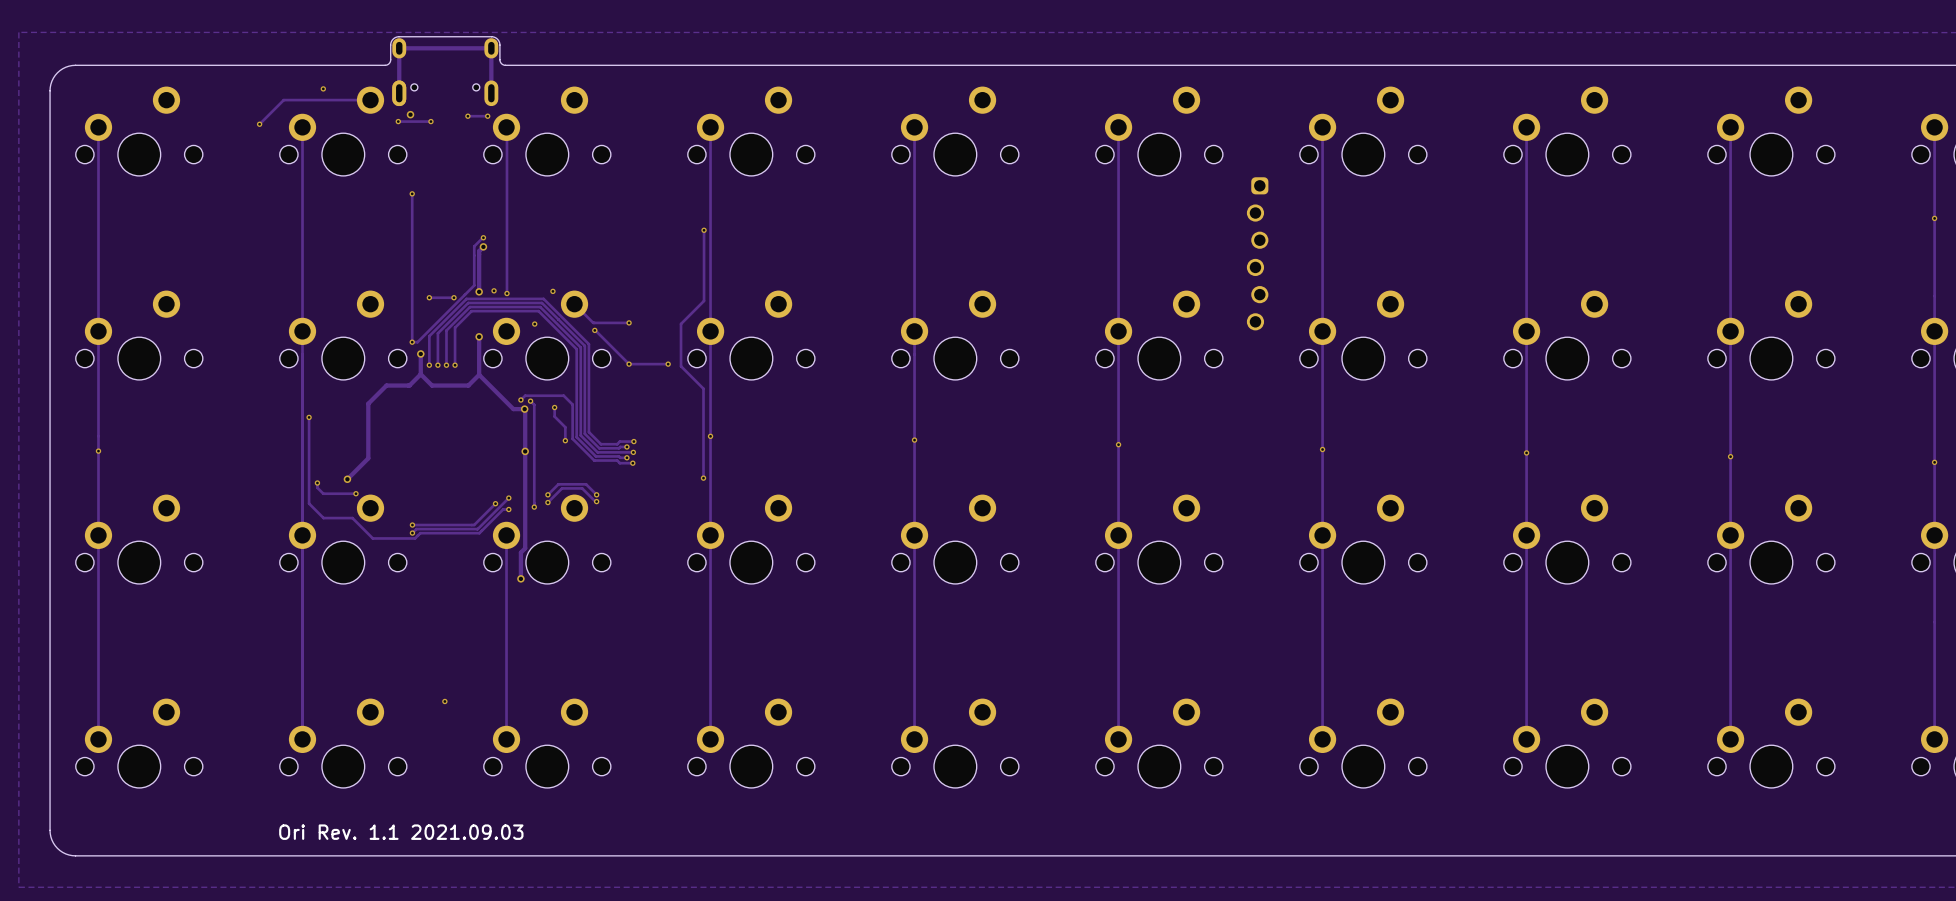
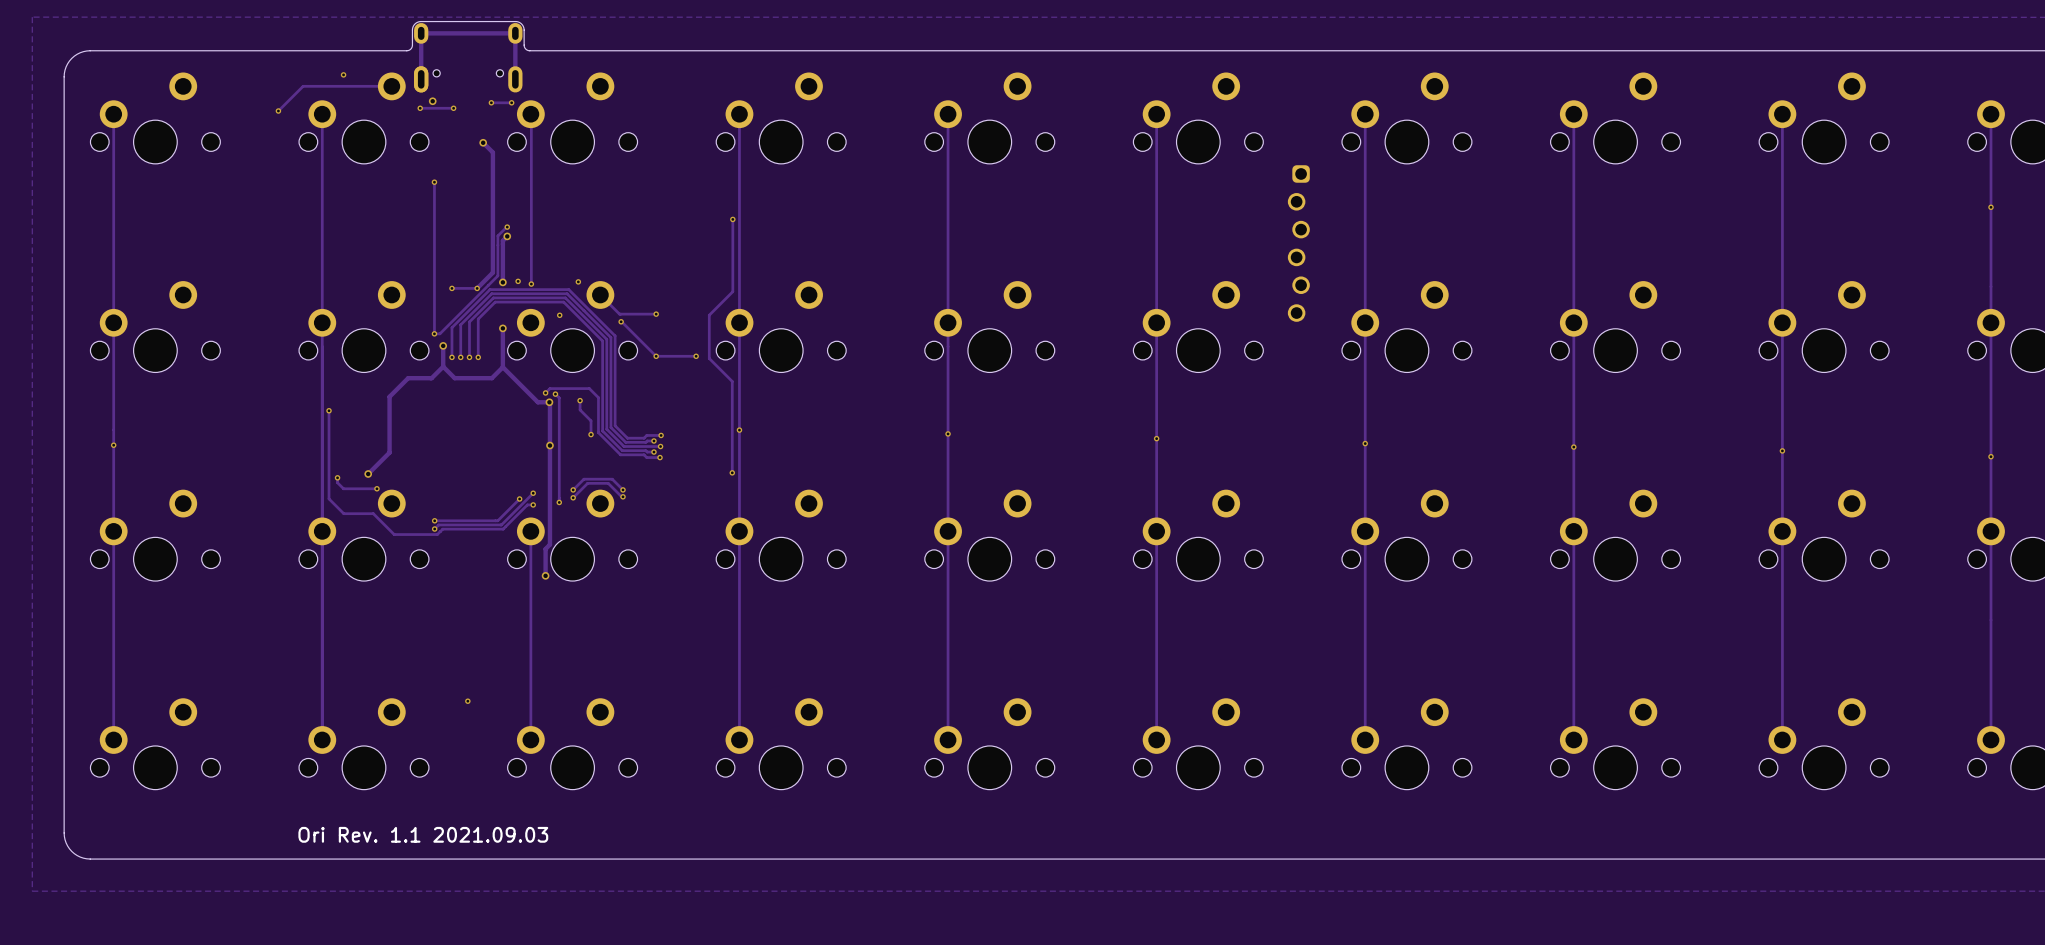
track: none -> (483, 142) (492, 152) (492, 272) (477, 288)
via: none -> (483, 142)

